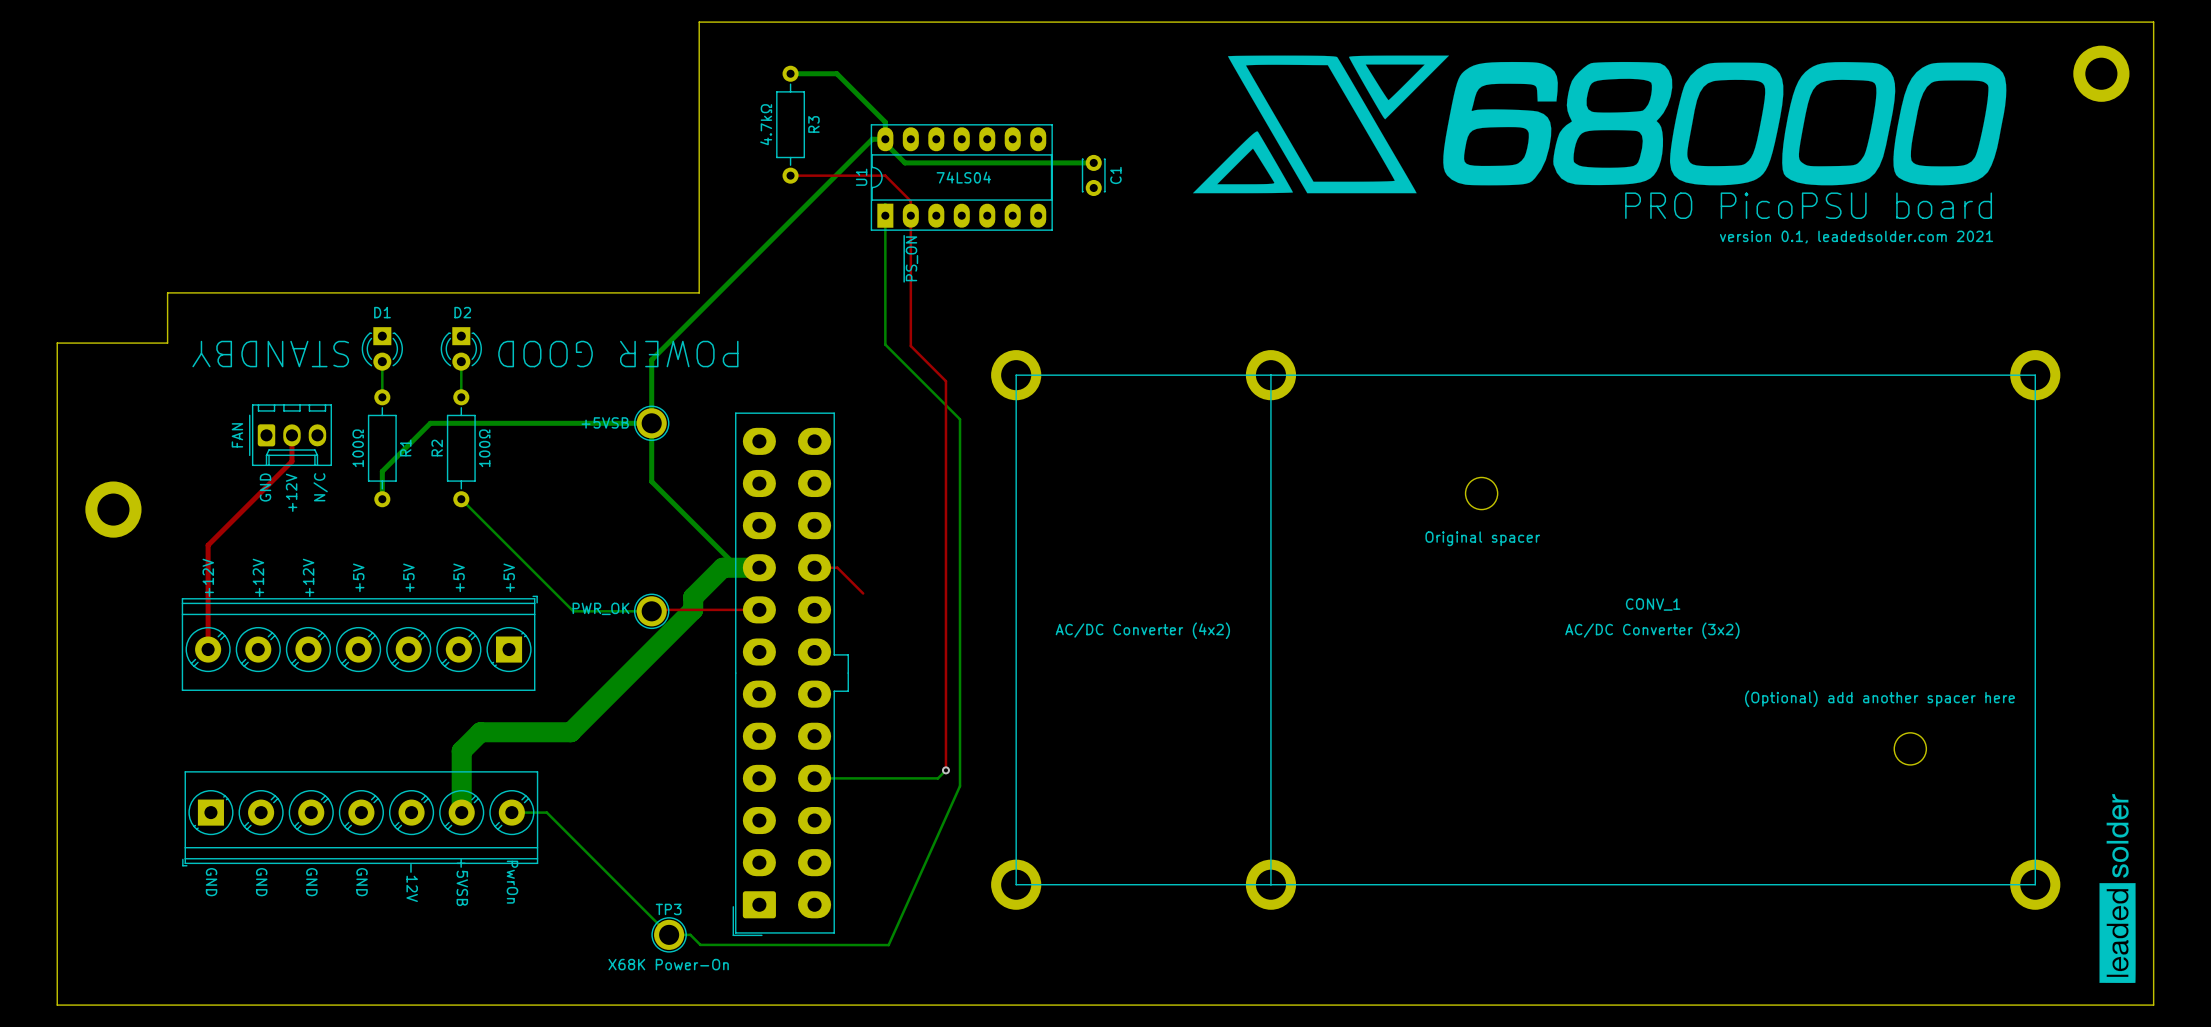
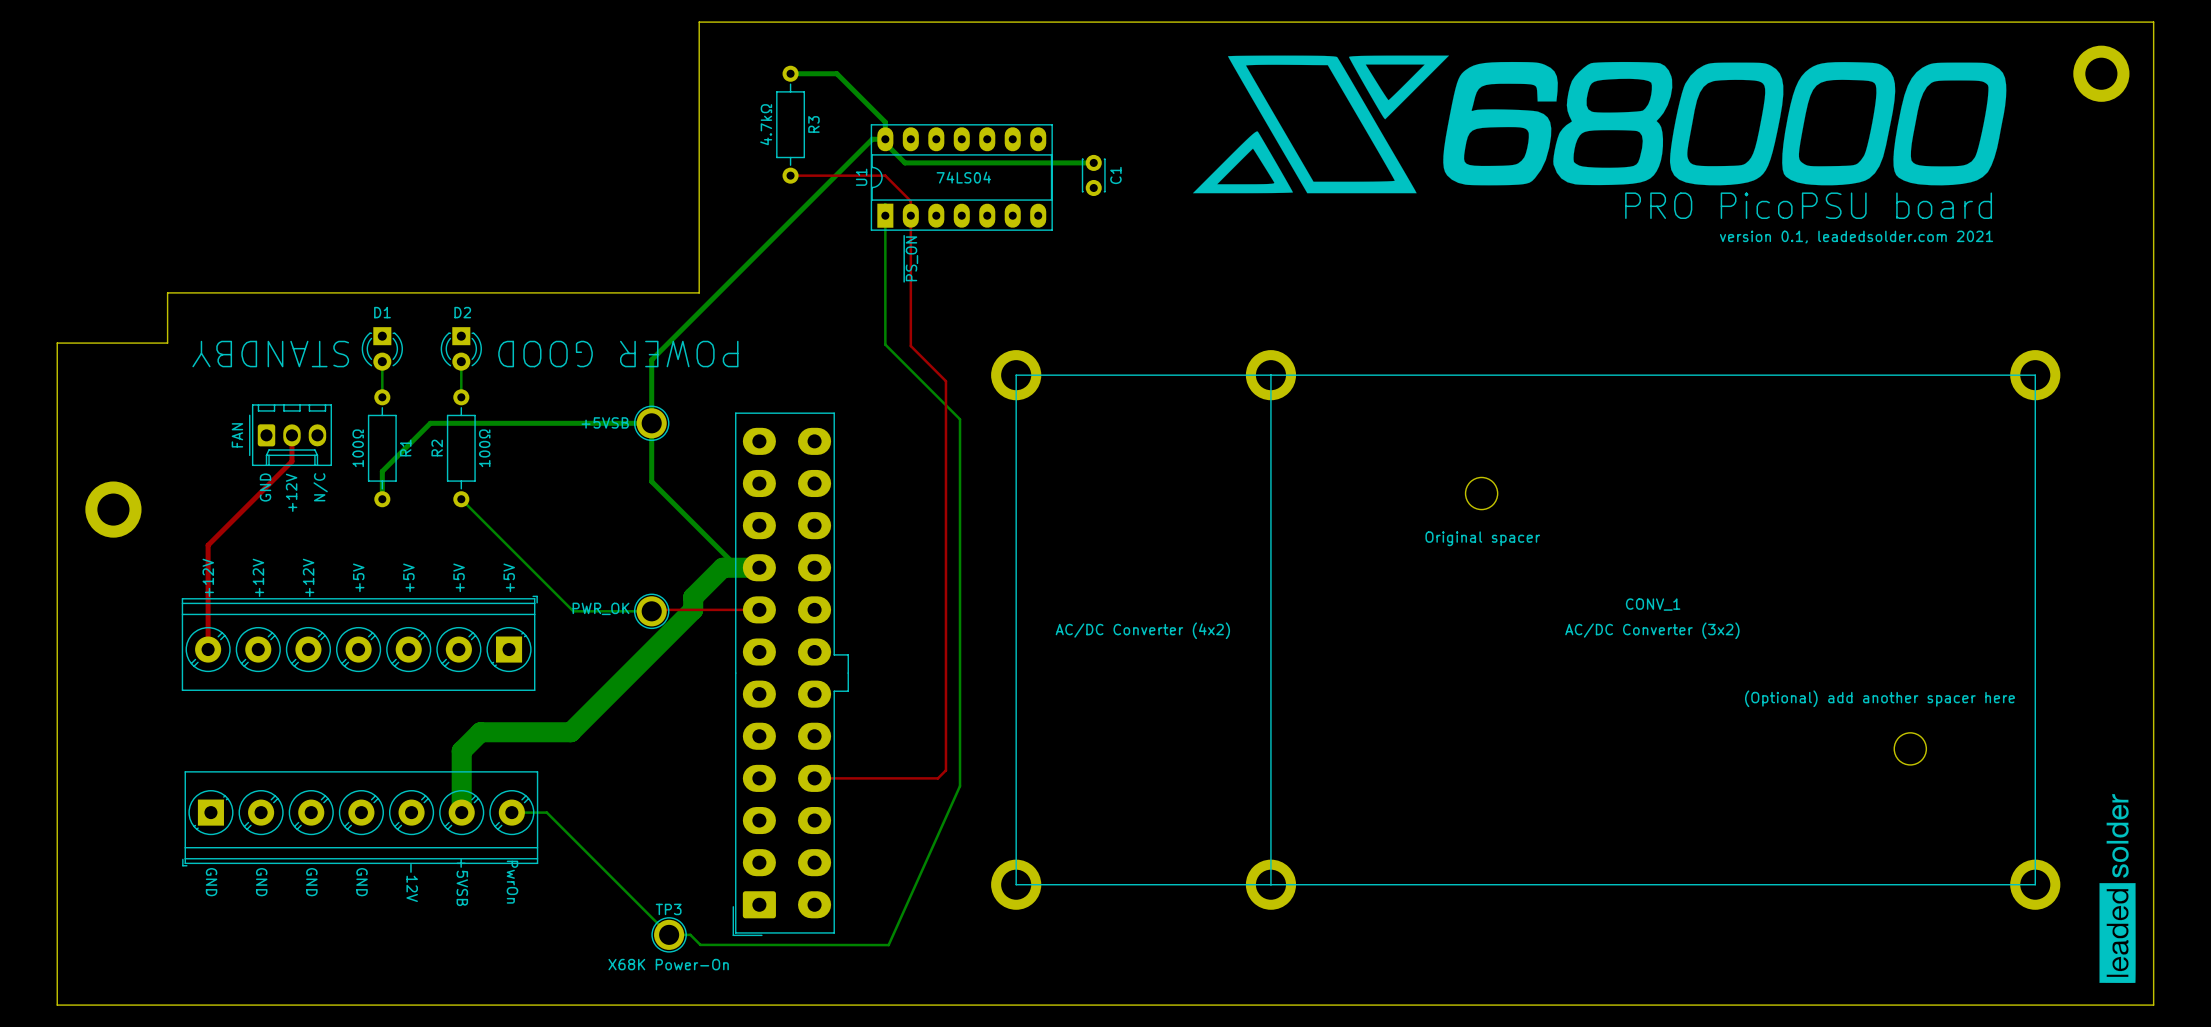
top track: (814, 567) (837, 567) (863, 593) -> none
bottom track: (945, 770) (937, 778) (814, 778) -> none
top track: none -> (945, 770) (937, 778) (814, 778)
via: (945, 770) -> none

